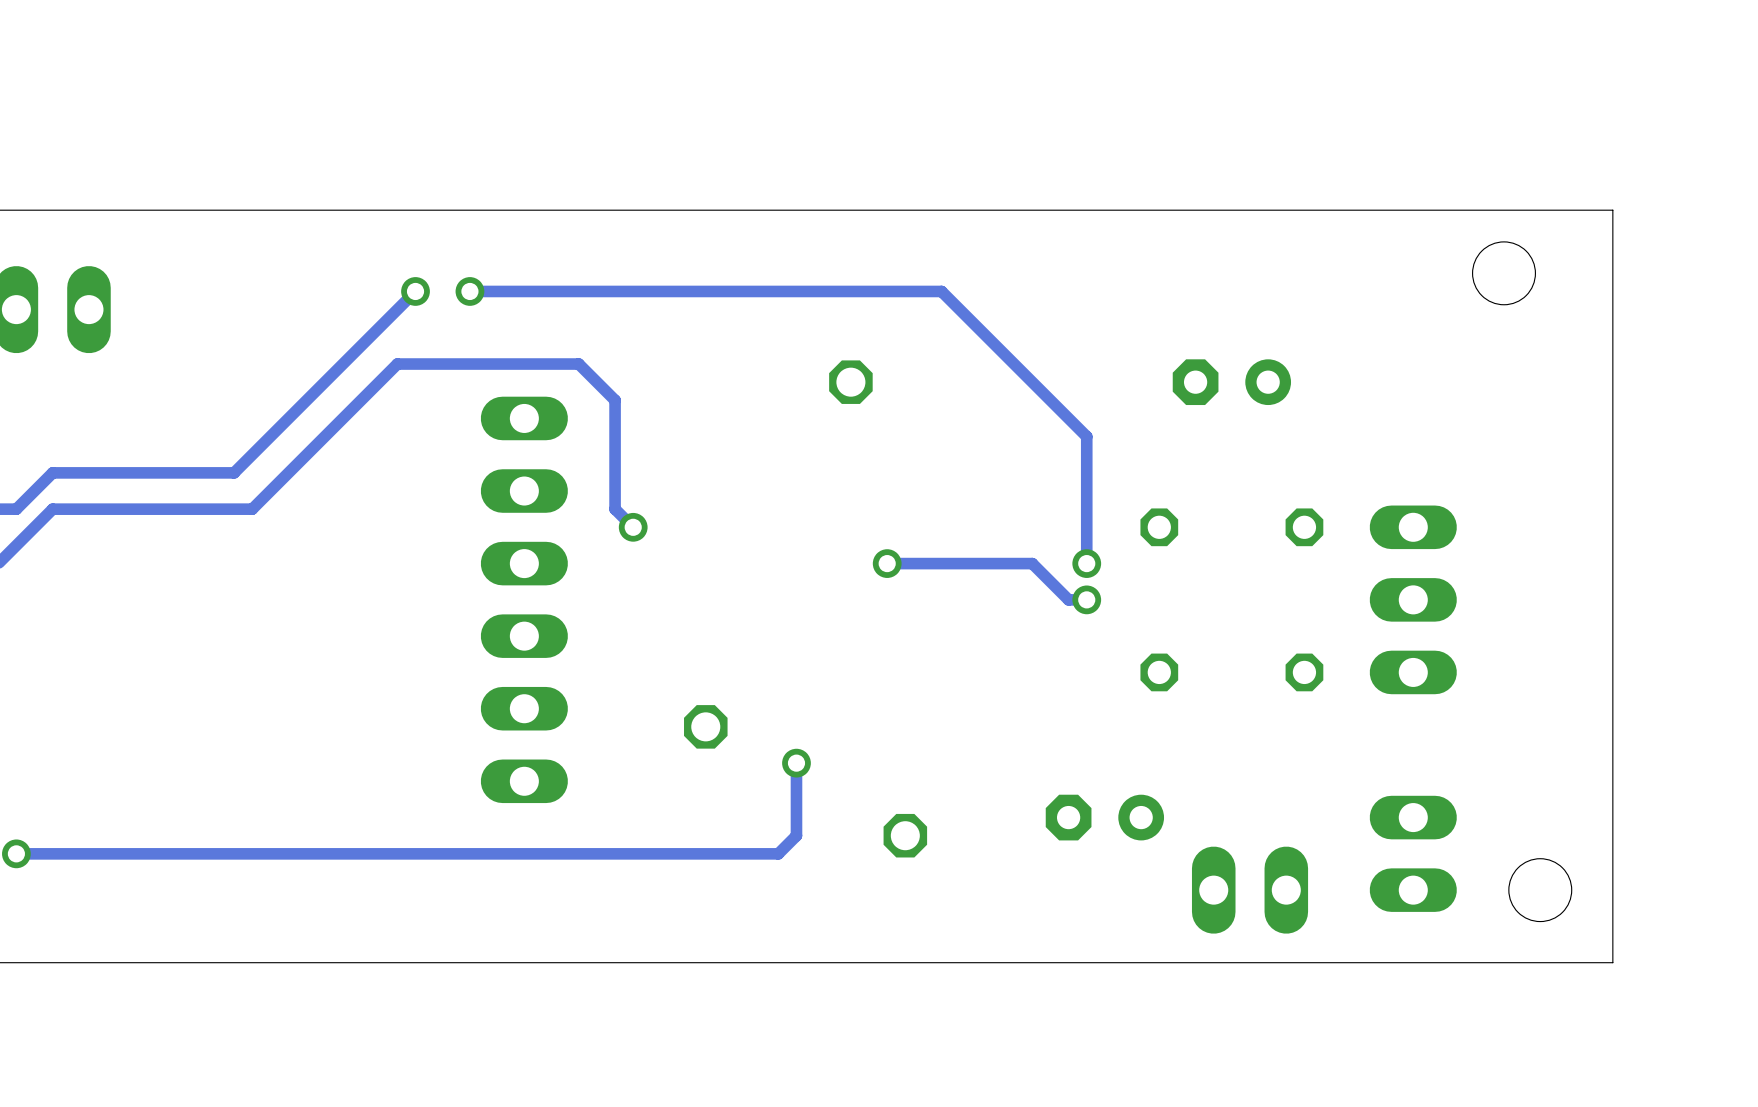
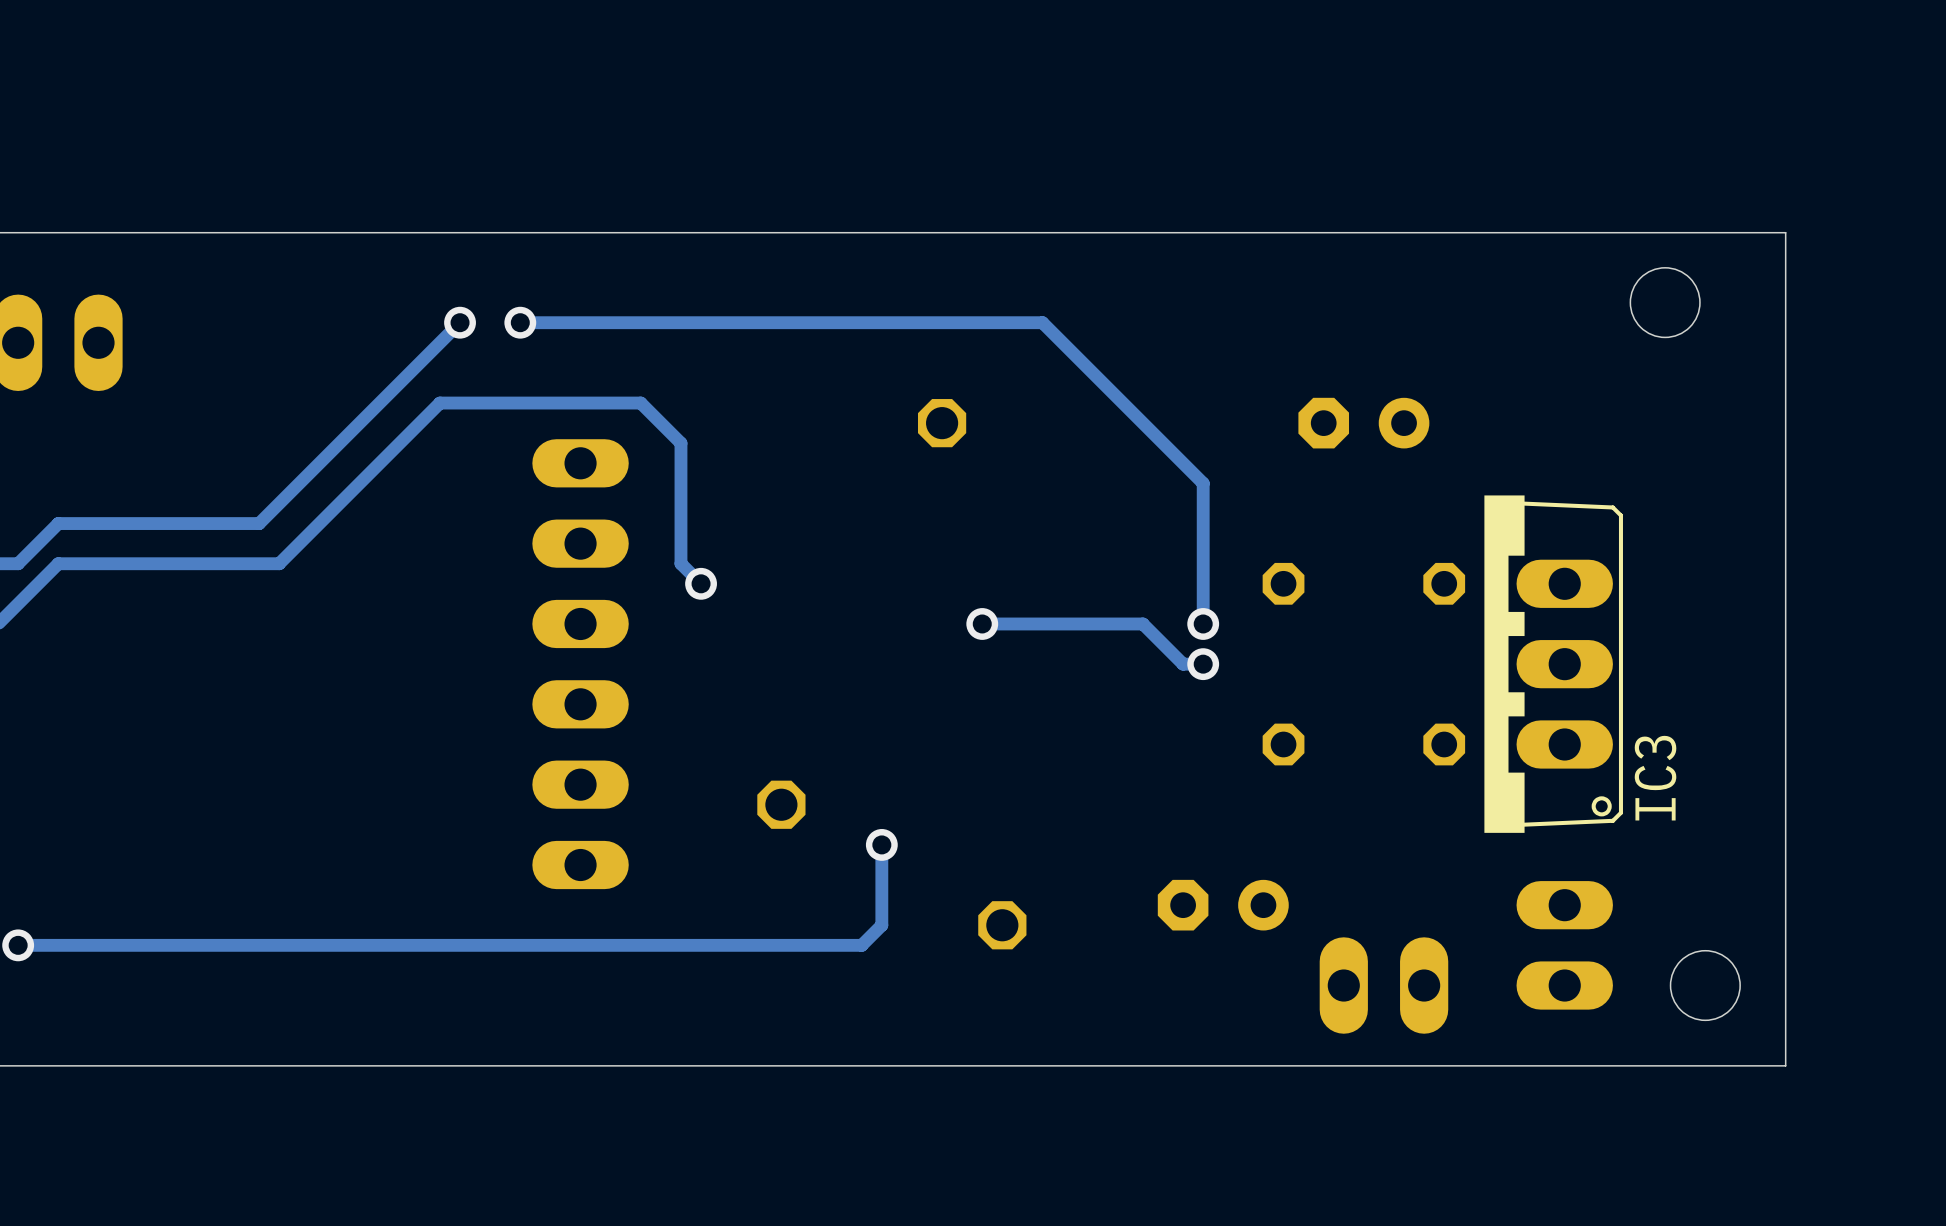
IC3 side: top (1413, 599) -> bottom (1553, 664)

